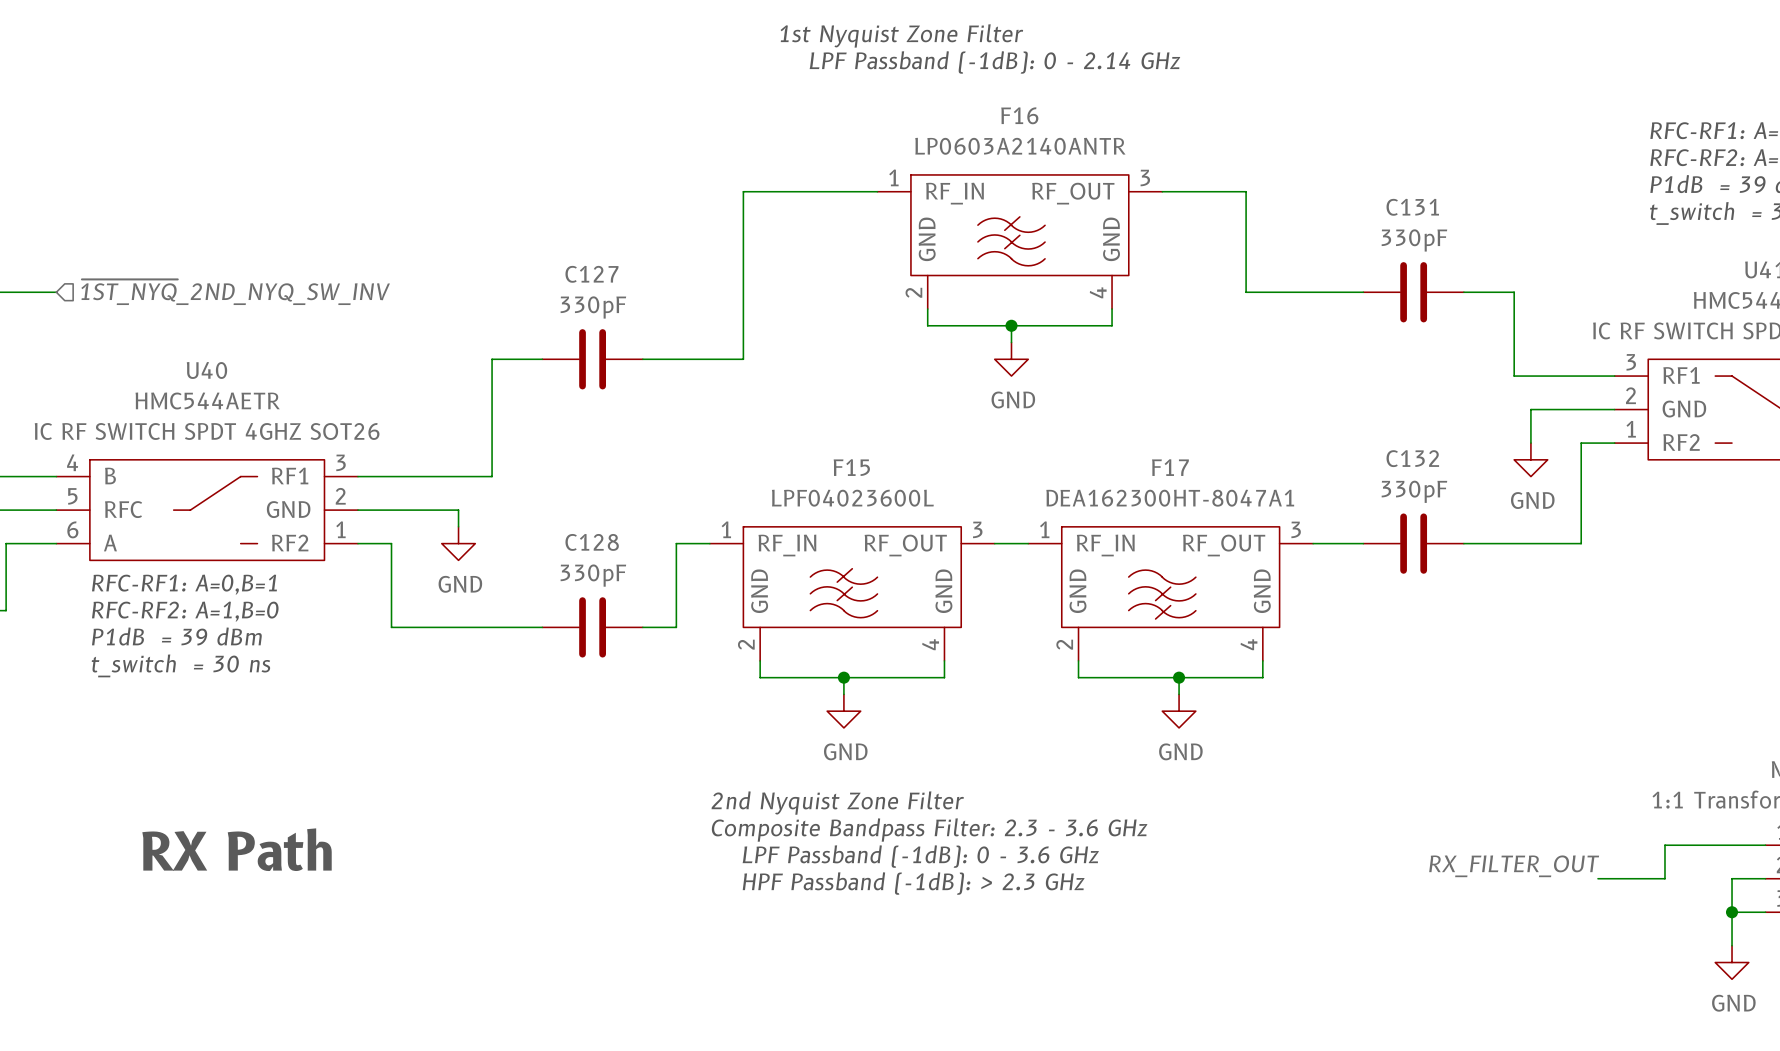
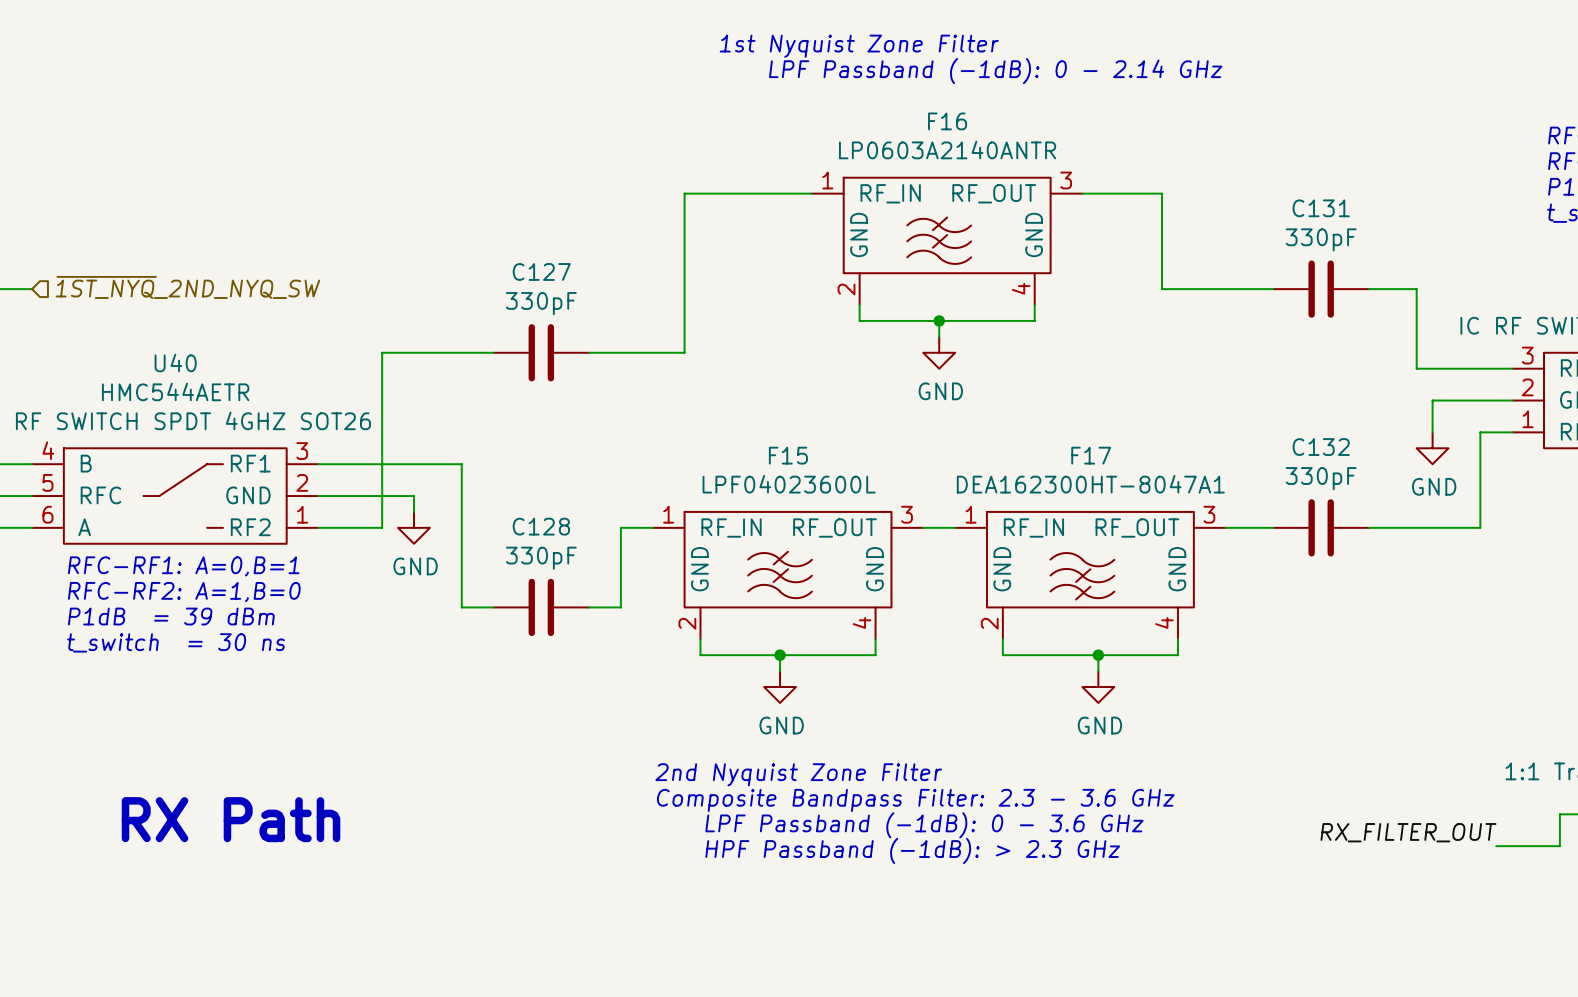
hierarchical label: ~{1ST_NYQ}_2ND_NYQ_SW_INV (235, 292) -> ~{1ST_NYQ}_2ND_NYQ_SW (187, 287)
wire: (492, 359) (492, 476) -> (445, 352) (382, 352) (382, 527) (350, 527)
wire: (391, 543) (391, 627) (508, 627) -> (445, 464) (461, 464) (461, 607)

